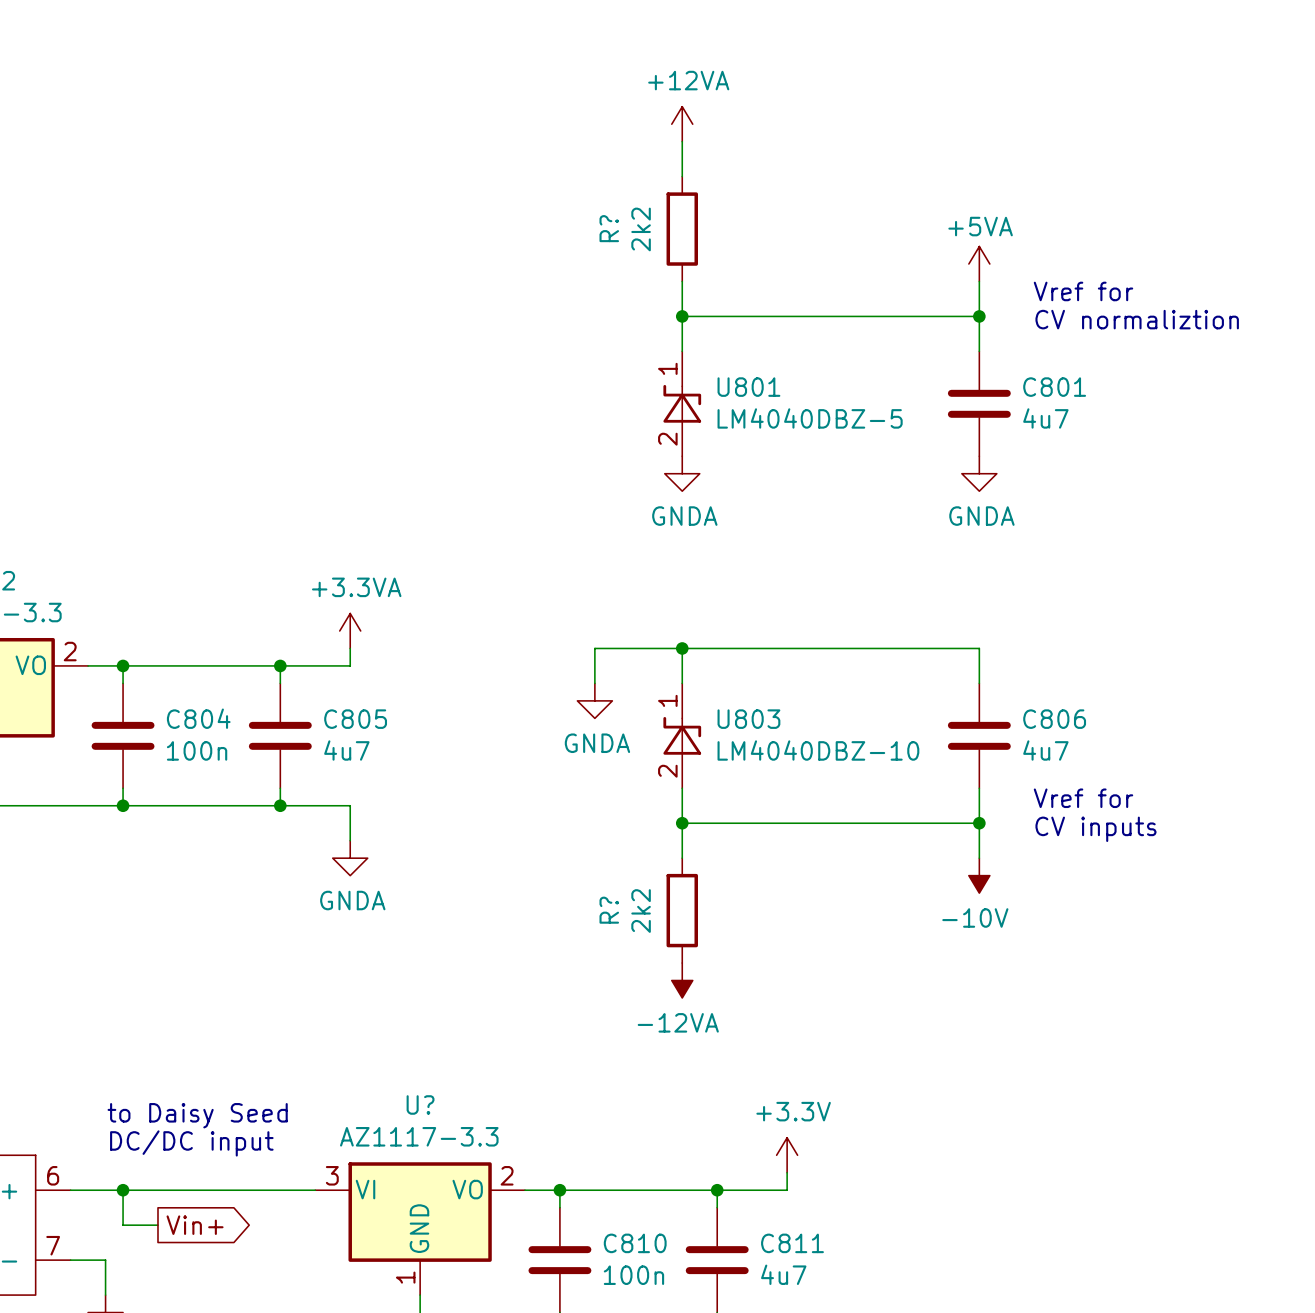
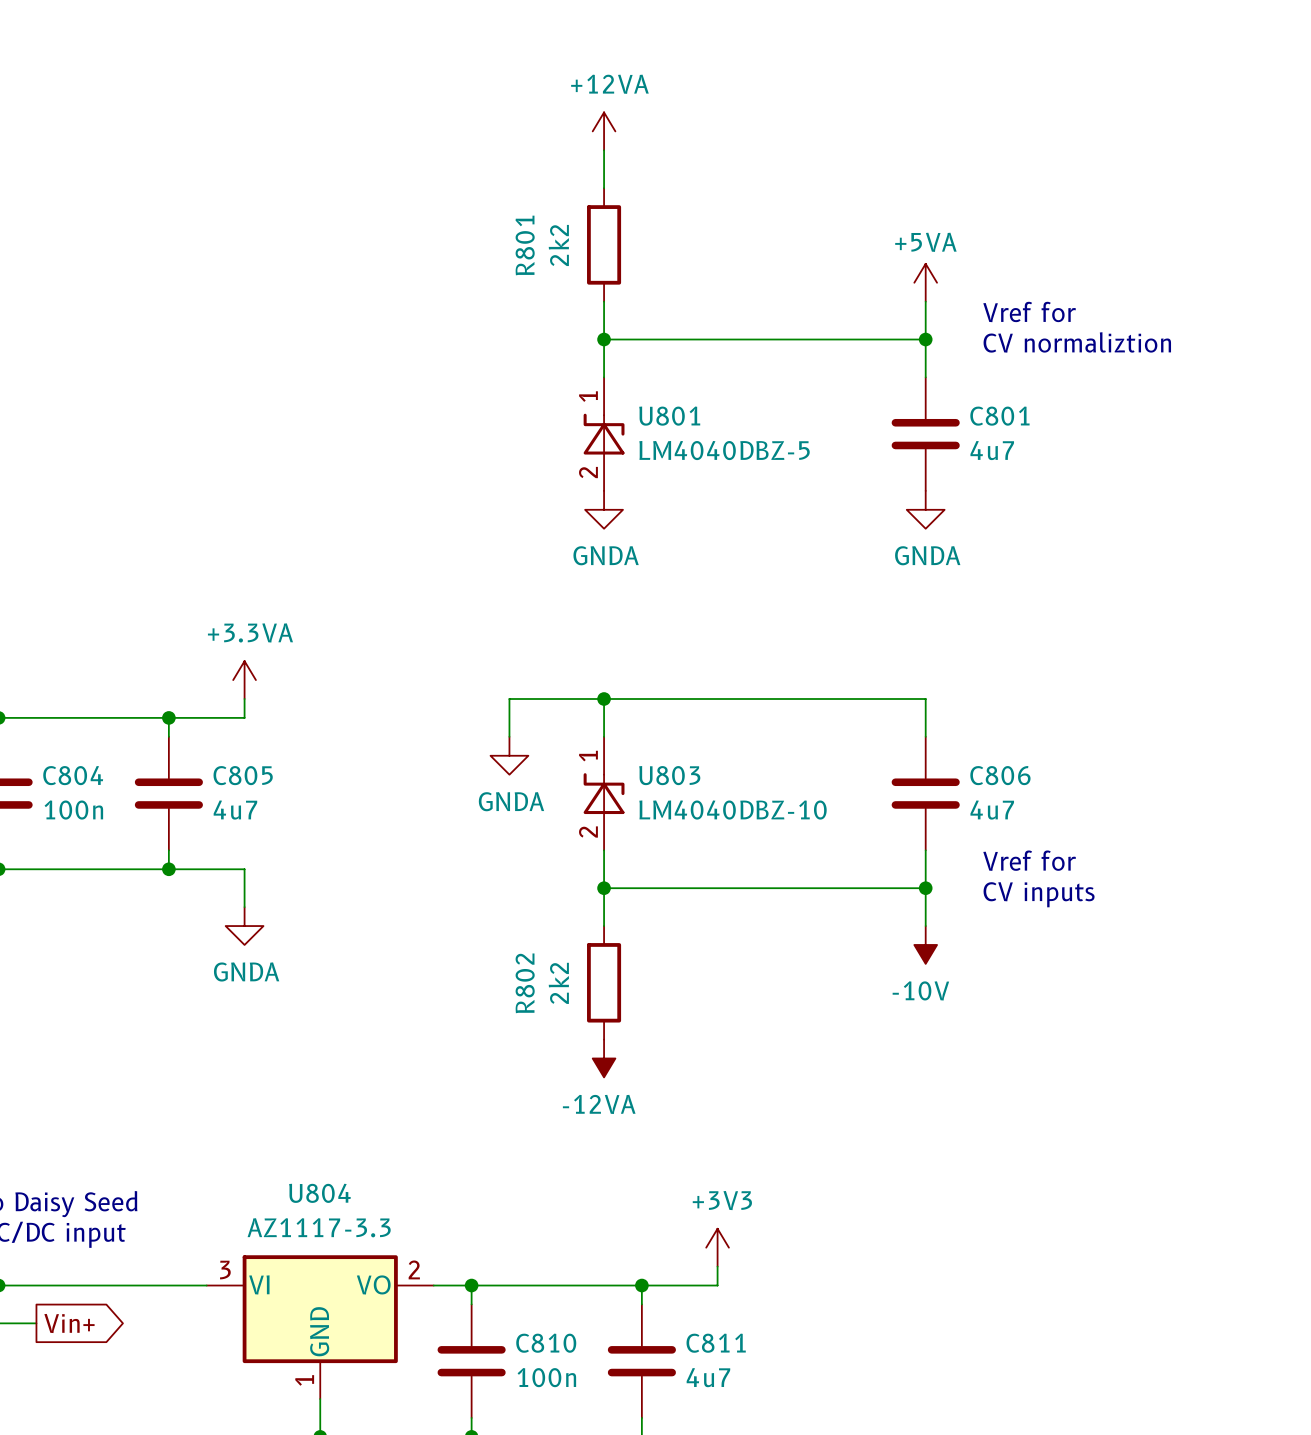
R? name: R? (609, 228) -> R801 (525, 245)
R? name: R? (609, 910) -> R802 (525, 983)
U? name: U? (420, 1104) -> U804 (319, 1193)
power symbol: +3.3V (787, 1155) -> +3V3 (717, 1247)

